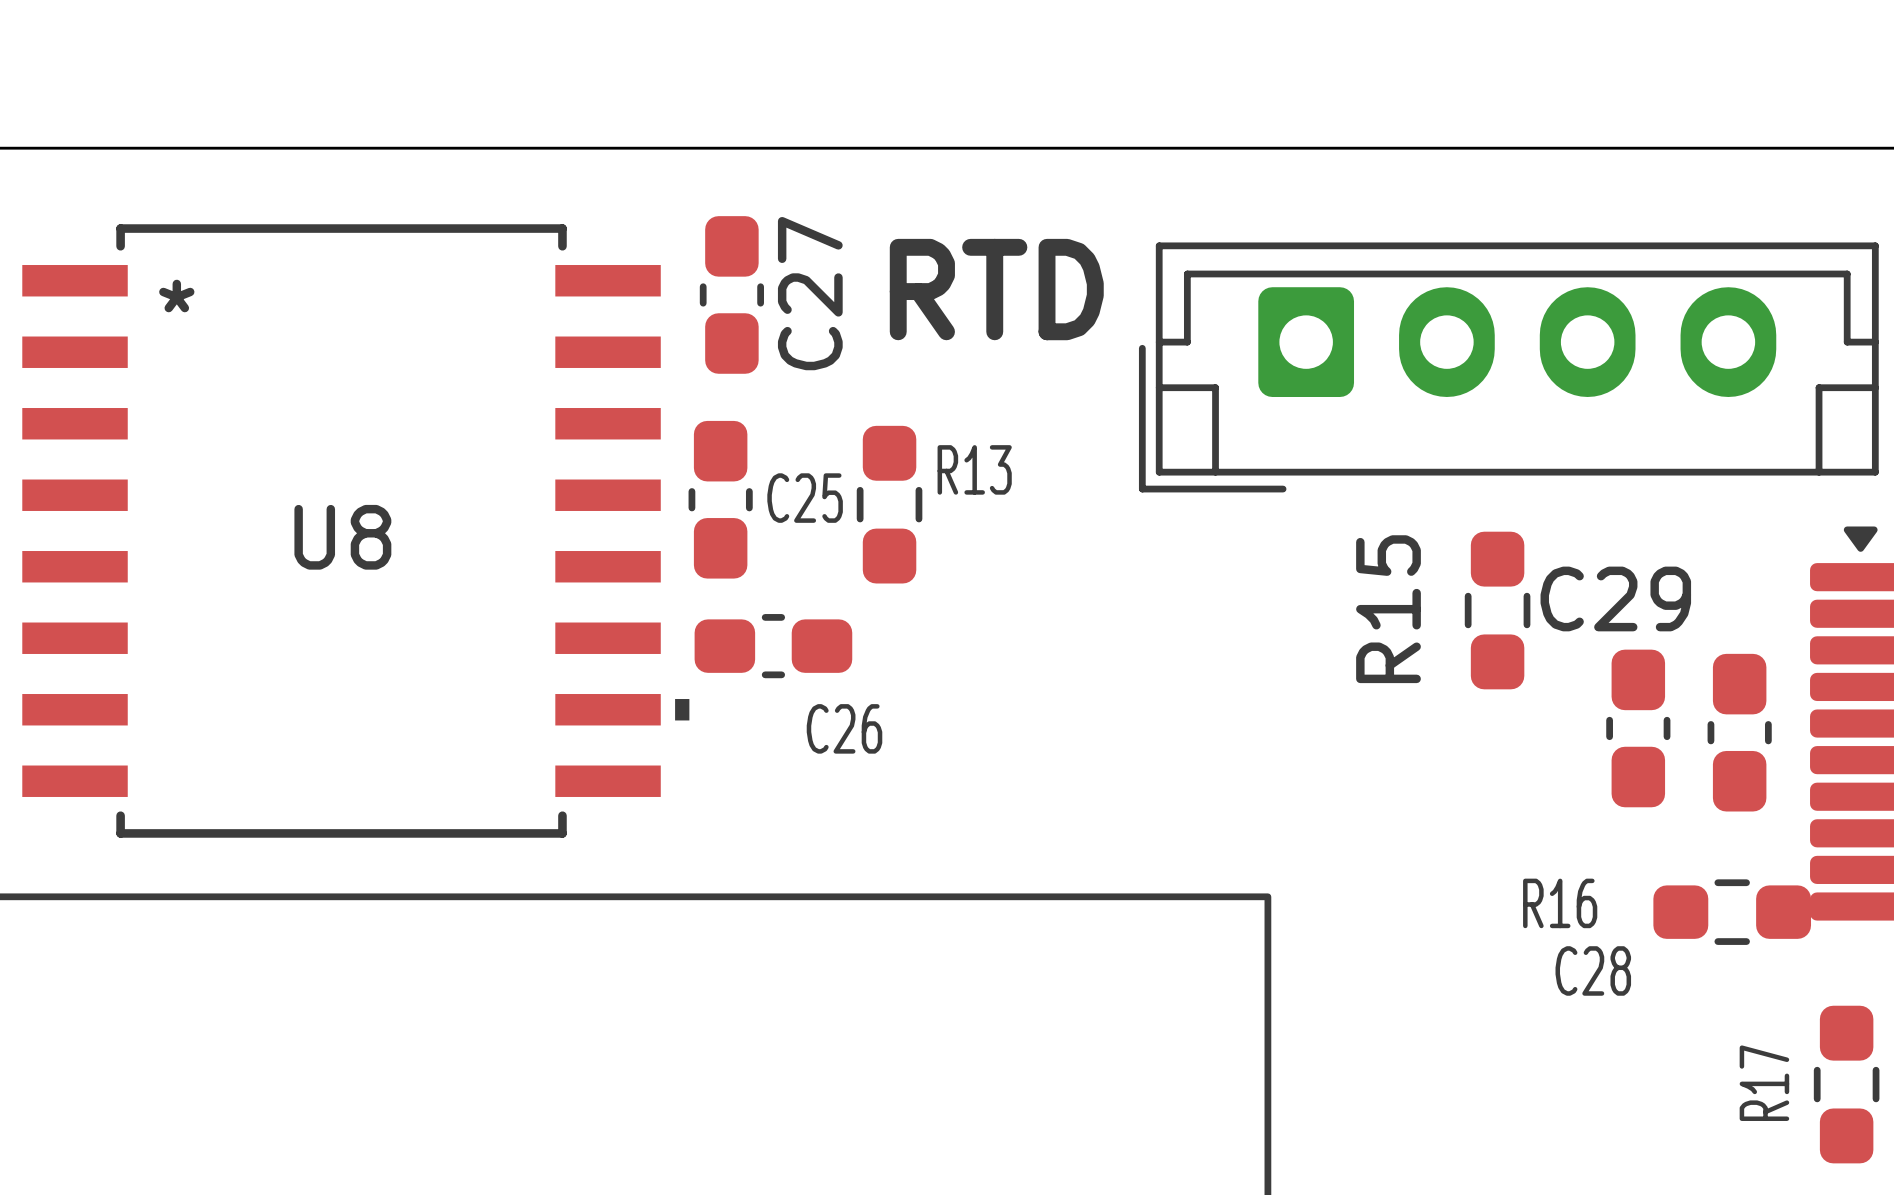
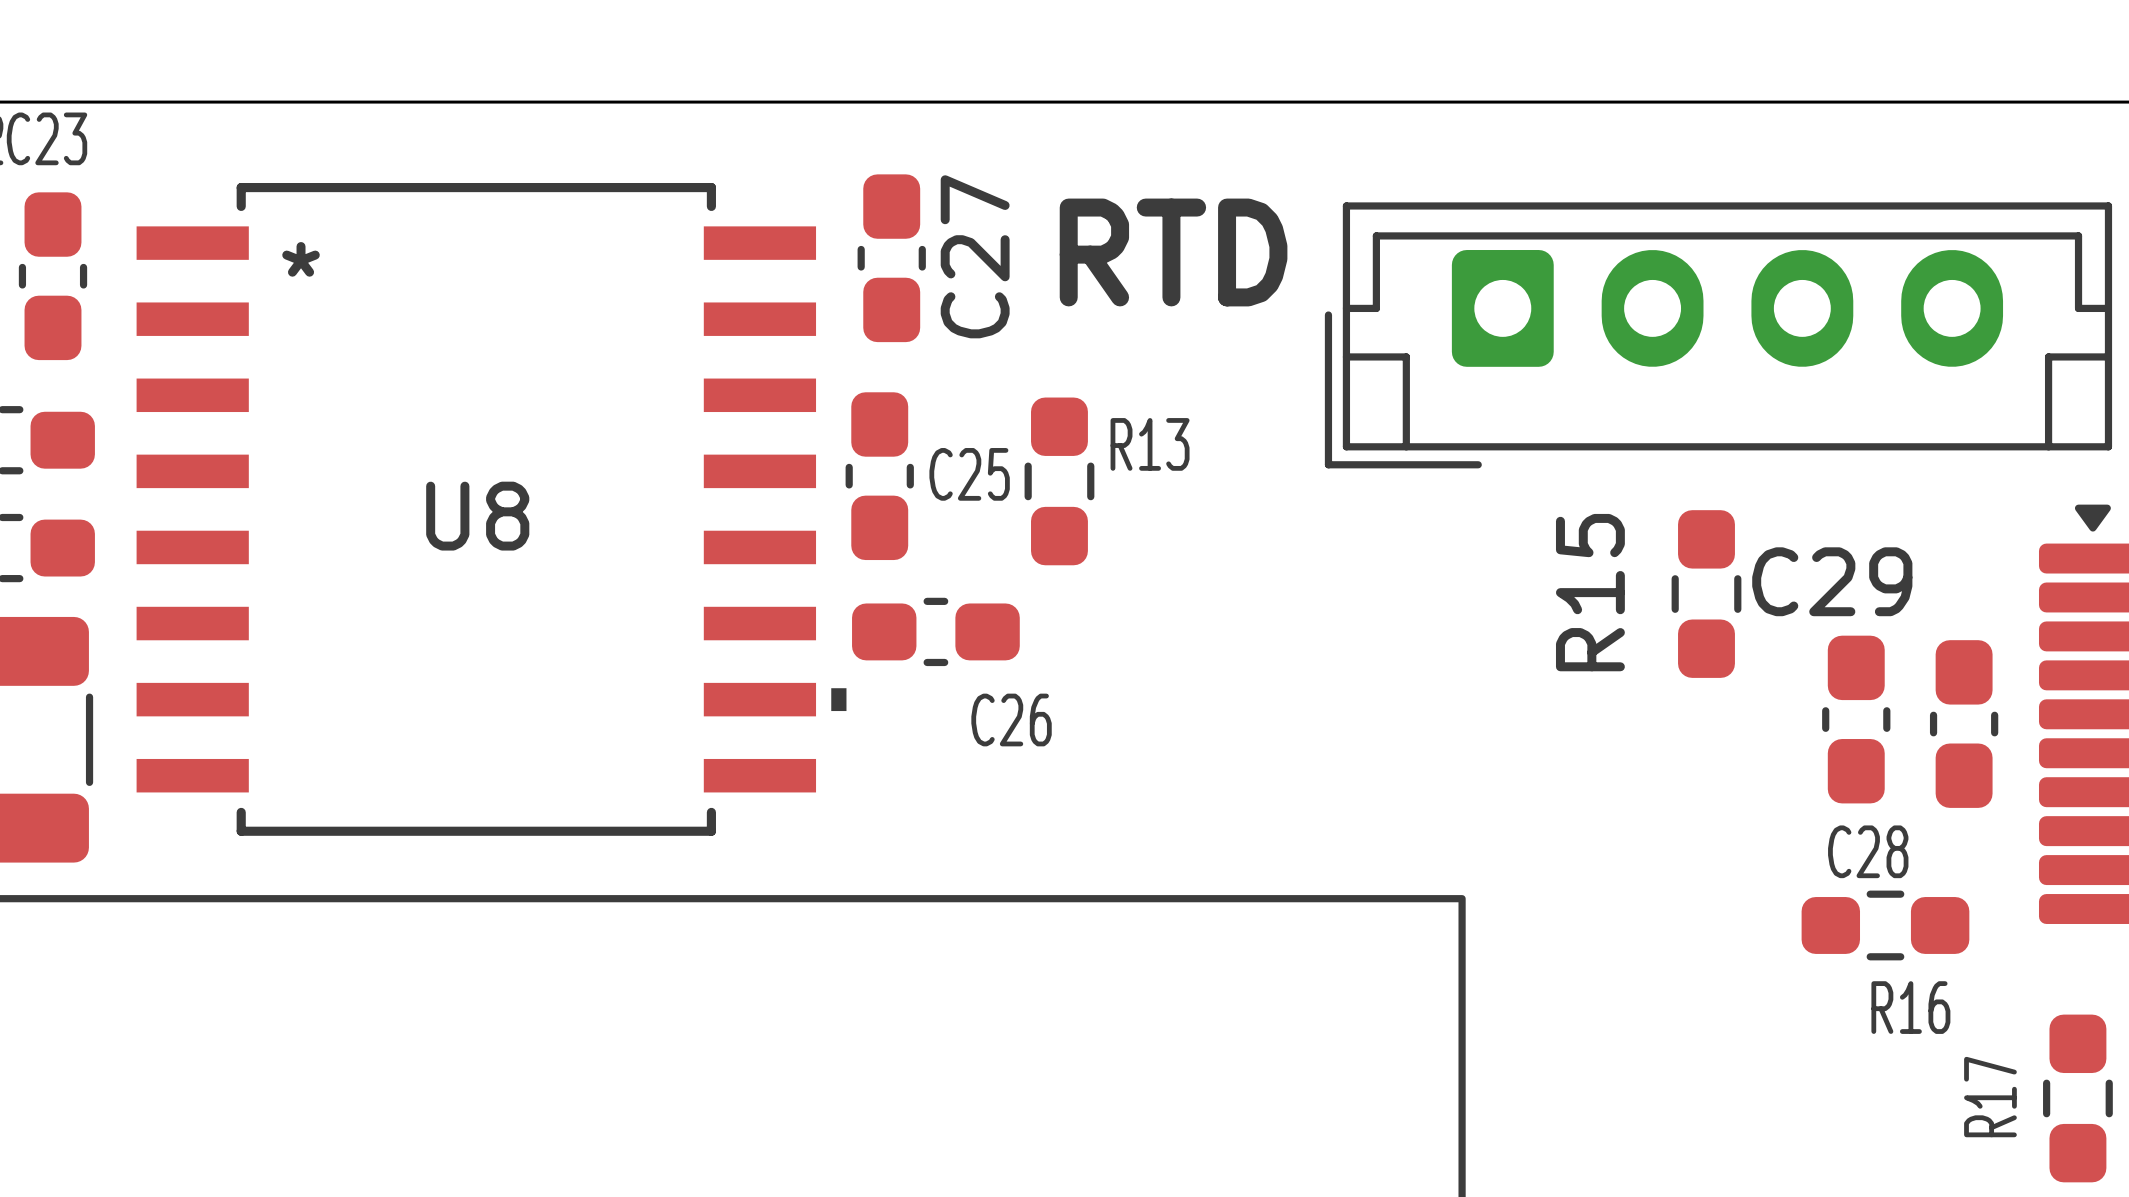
R16 name position: R16 (1560, 903) -> R16 (1910, 1007)
R16 position: (1732, 912) -> (1885, 925)
C28 name position: C28 (1593, 970) -> C28 (1868, 851)

